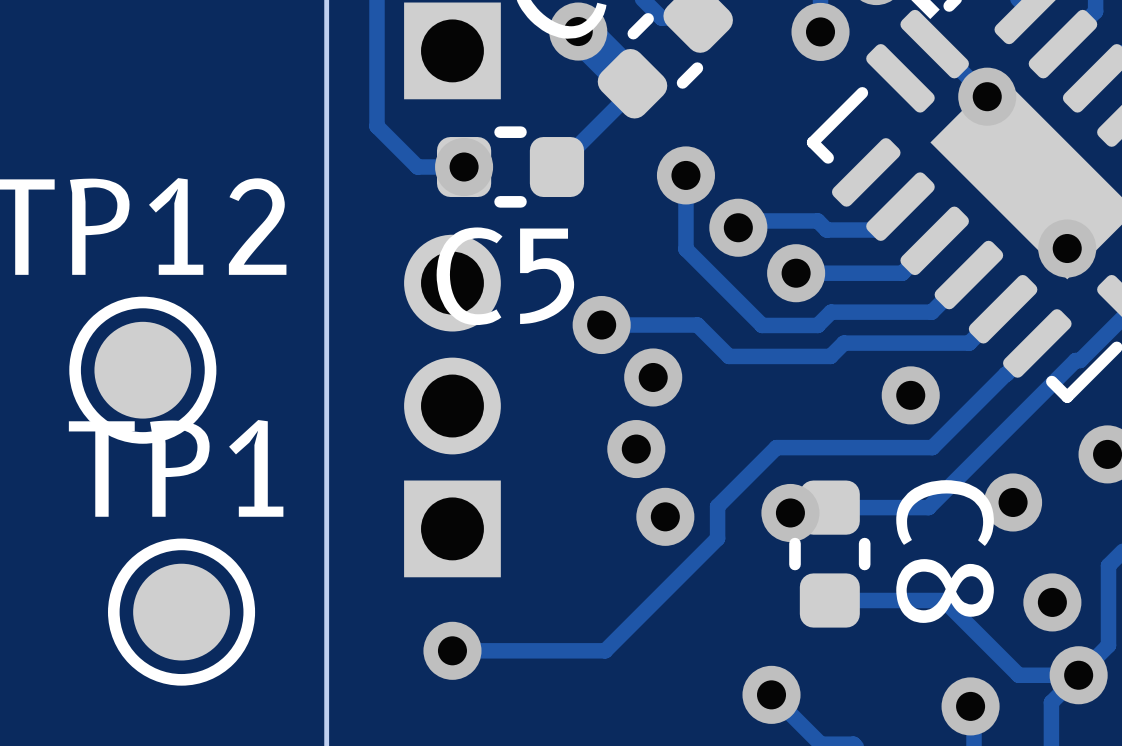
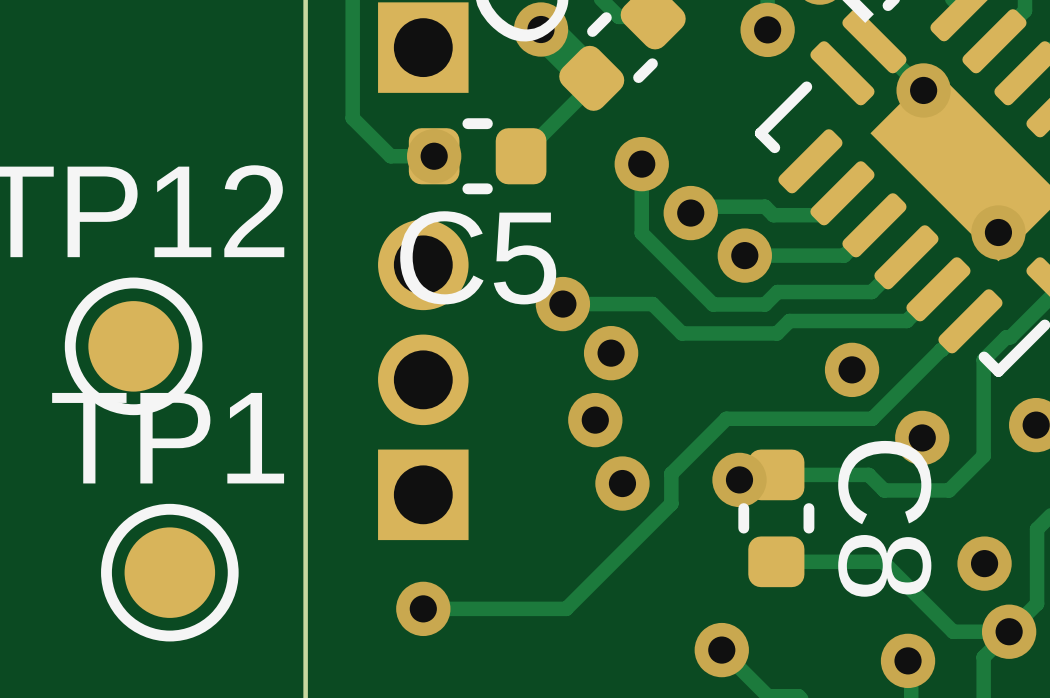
track: (1051, 384) (928, 507) -> (983, 359) (983, 455) (949, 490) (884, 490) (868, 474)
via position: (1013, 502) -> (922, 437)

